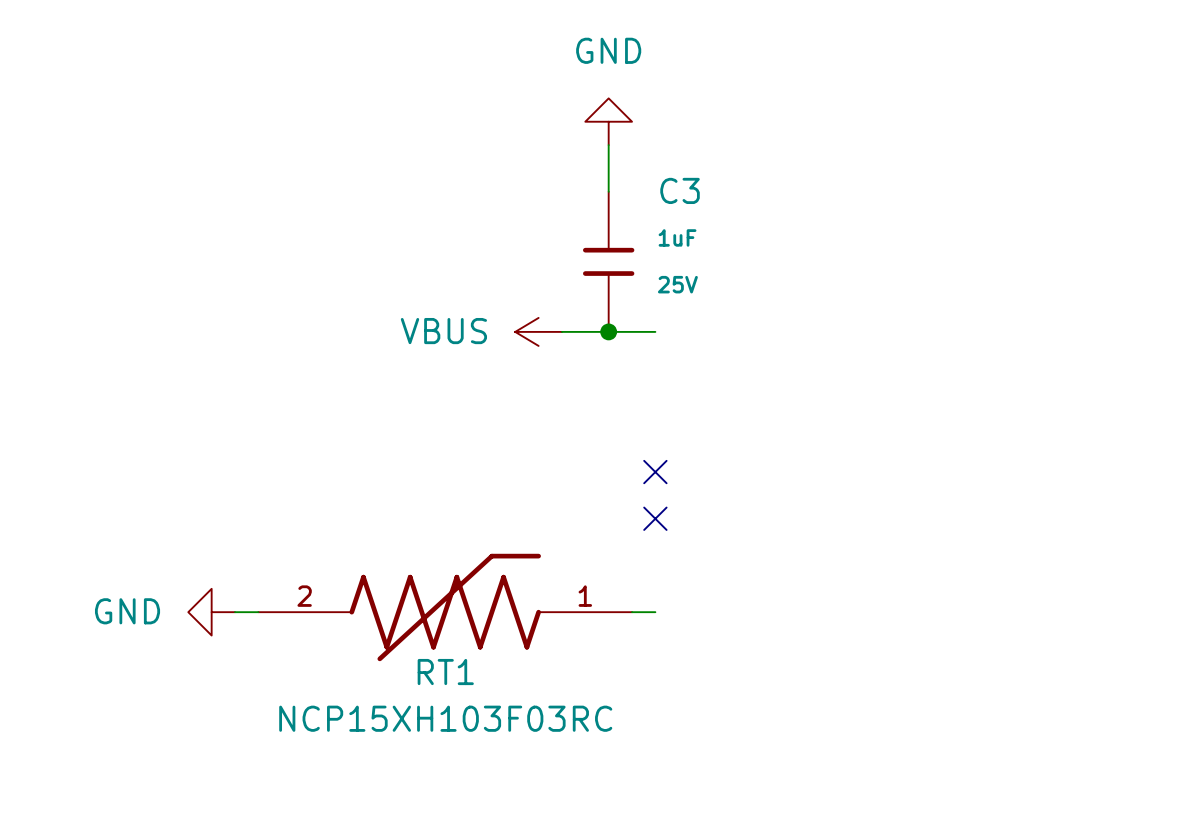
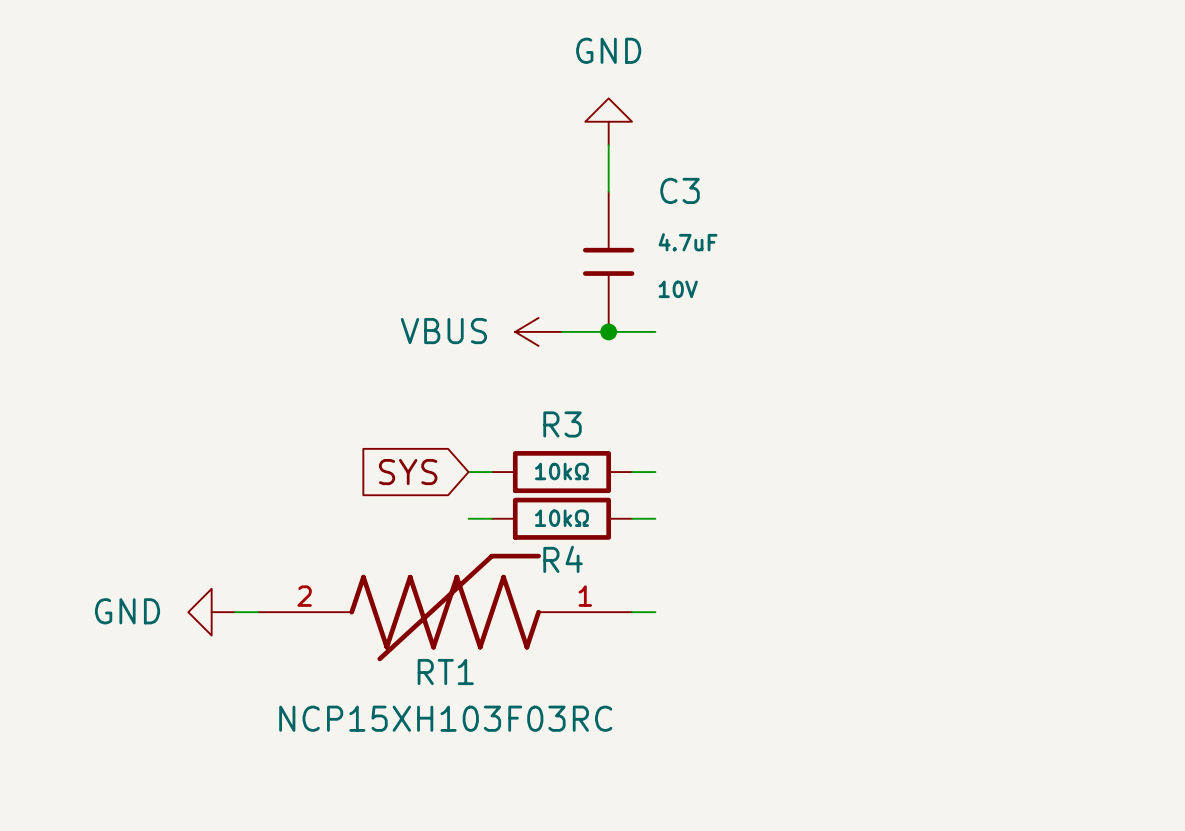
C3 value: 1uF (677, 237) -> 4.7uF (688, 242)
C3 text: 25V (677, 284) -> 10V (678, 289)
global label: none -> SYS (408, 472)
wire: none -> (468, 472) (491, 472)
R3: none -> 10kΩ (561, 472)
wire: none -> (632, 472) (655, 472)
no-connect mark: (655, 472) -> none
wire: none -> (468, 518) (491, 518)
R4: none -> 10kΩ (561, 518)
wire: none -> (632, 518) (655, 518)
no-connect mark: (655, 518) -> none

